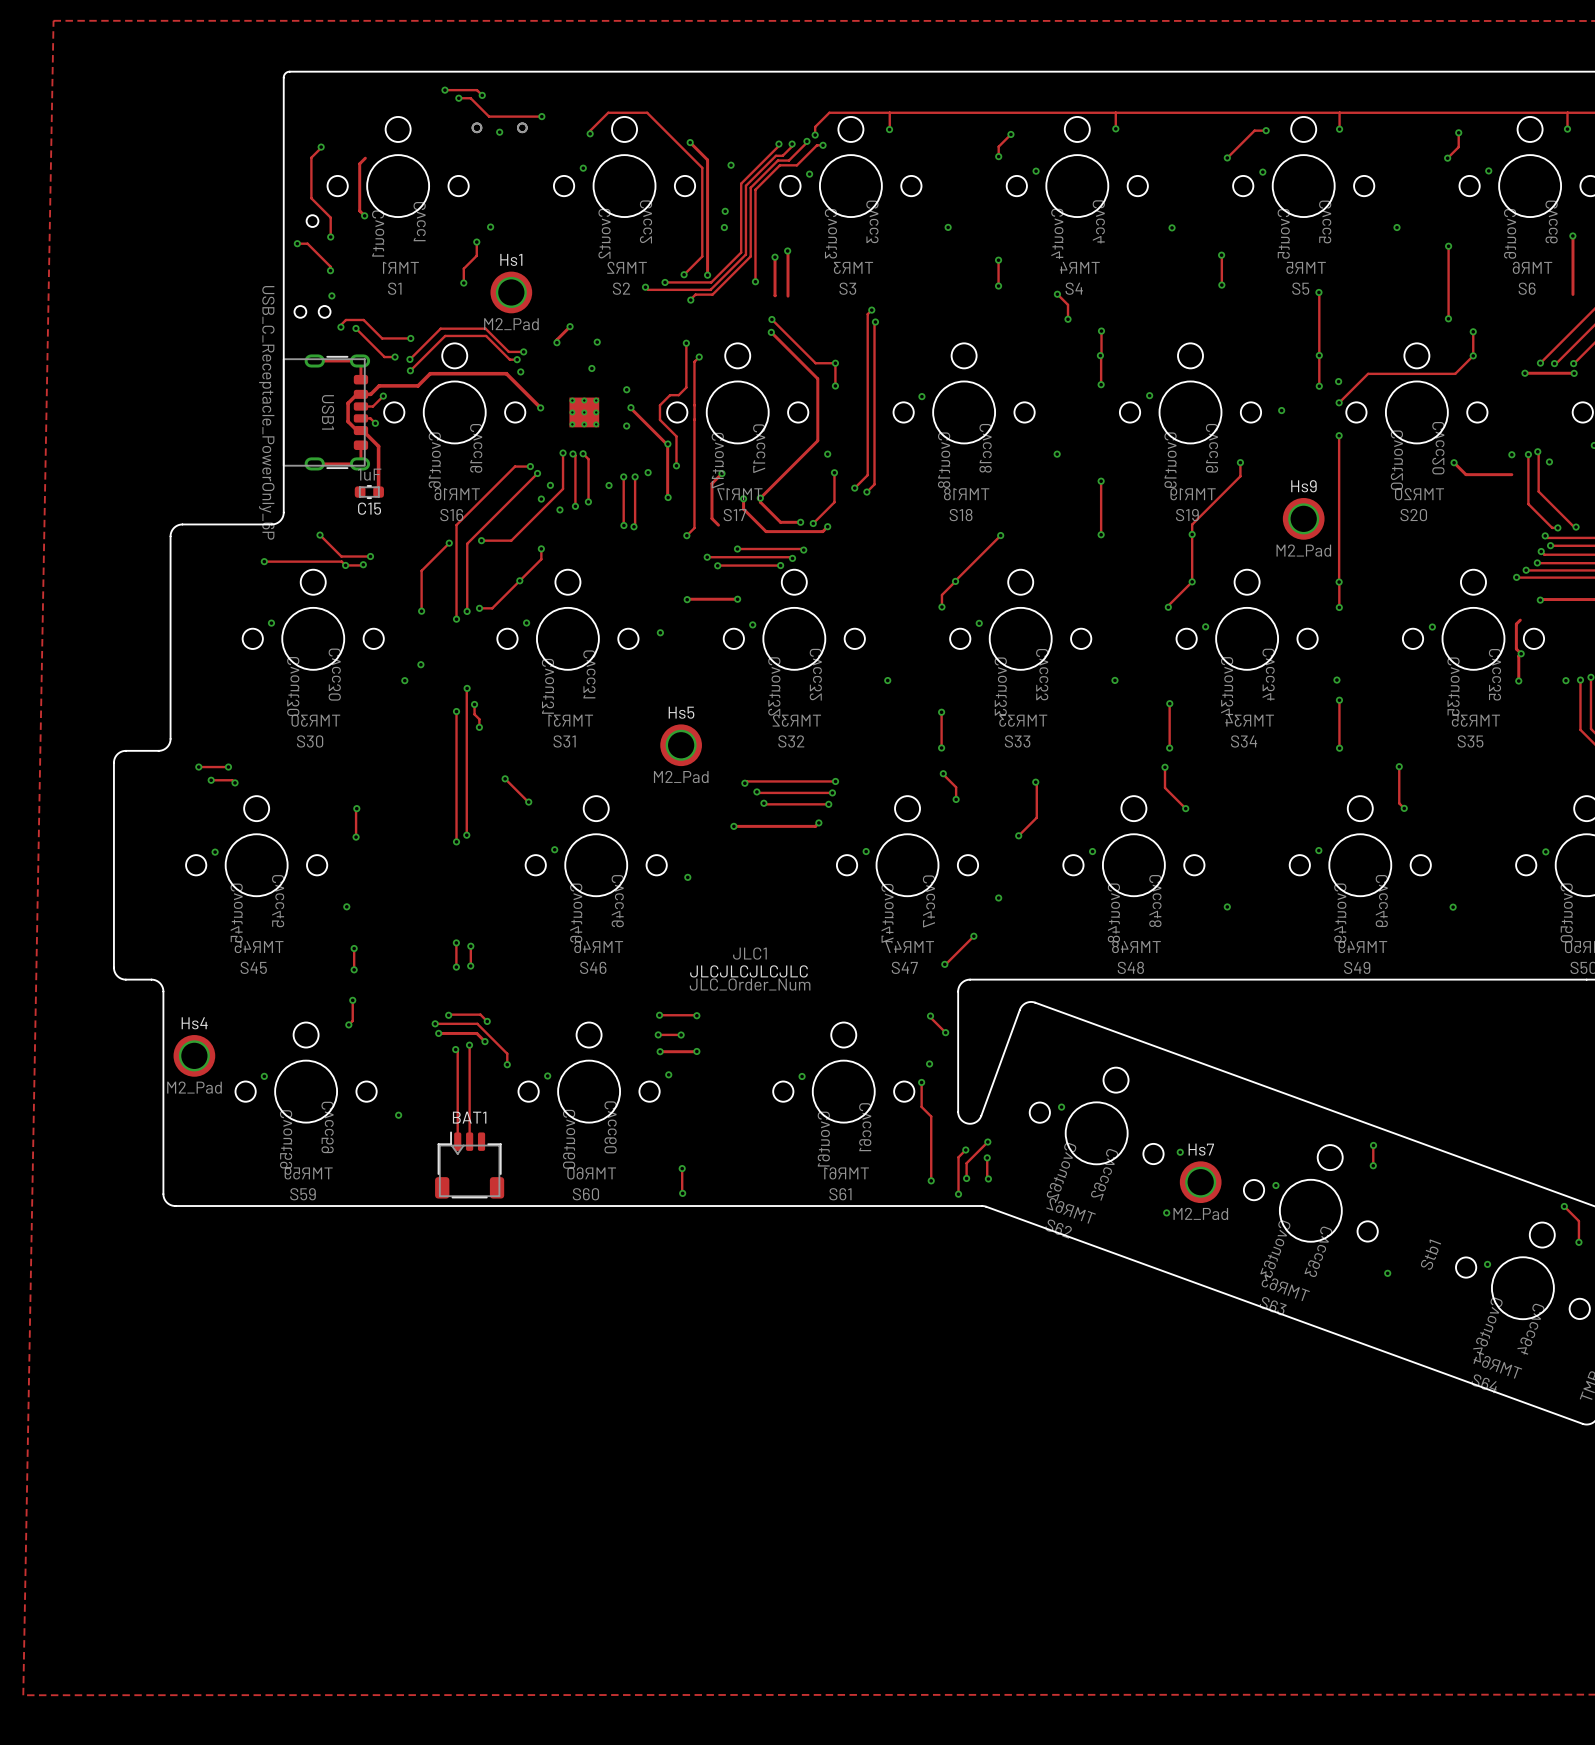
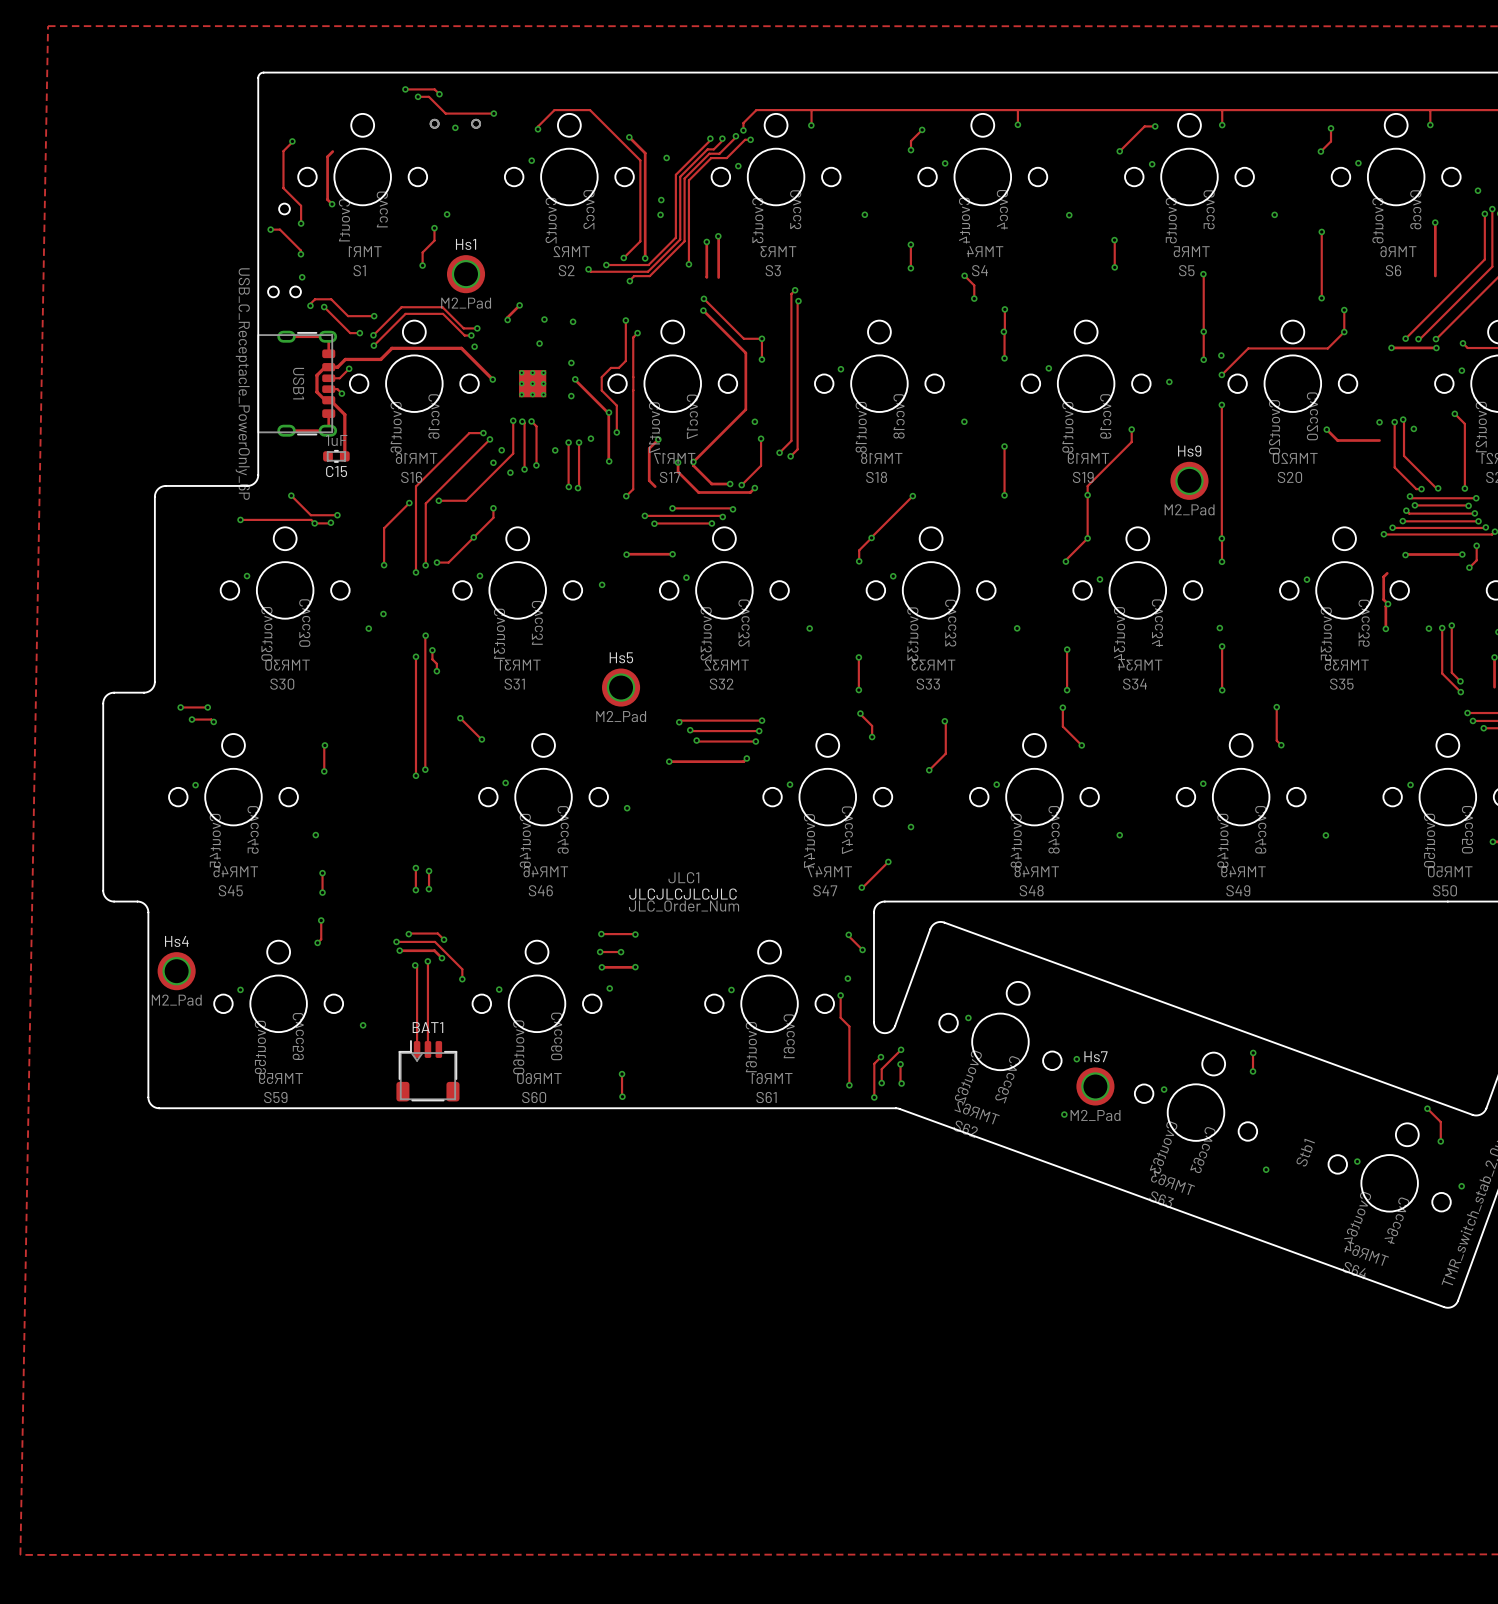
via: none -> (573, 321)

